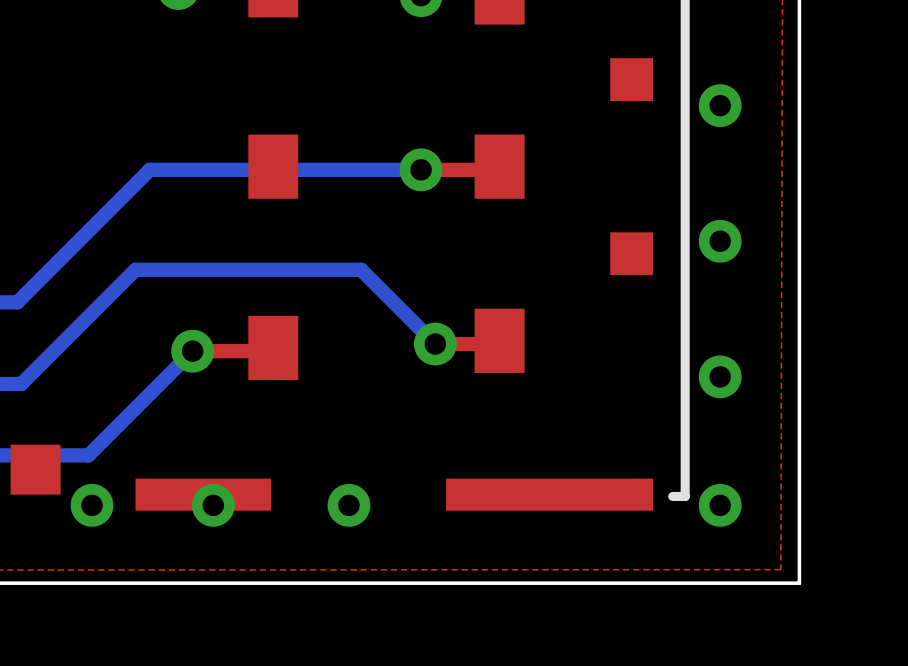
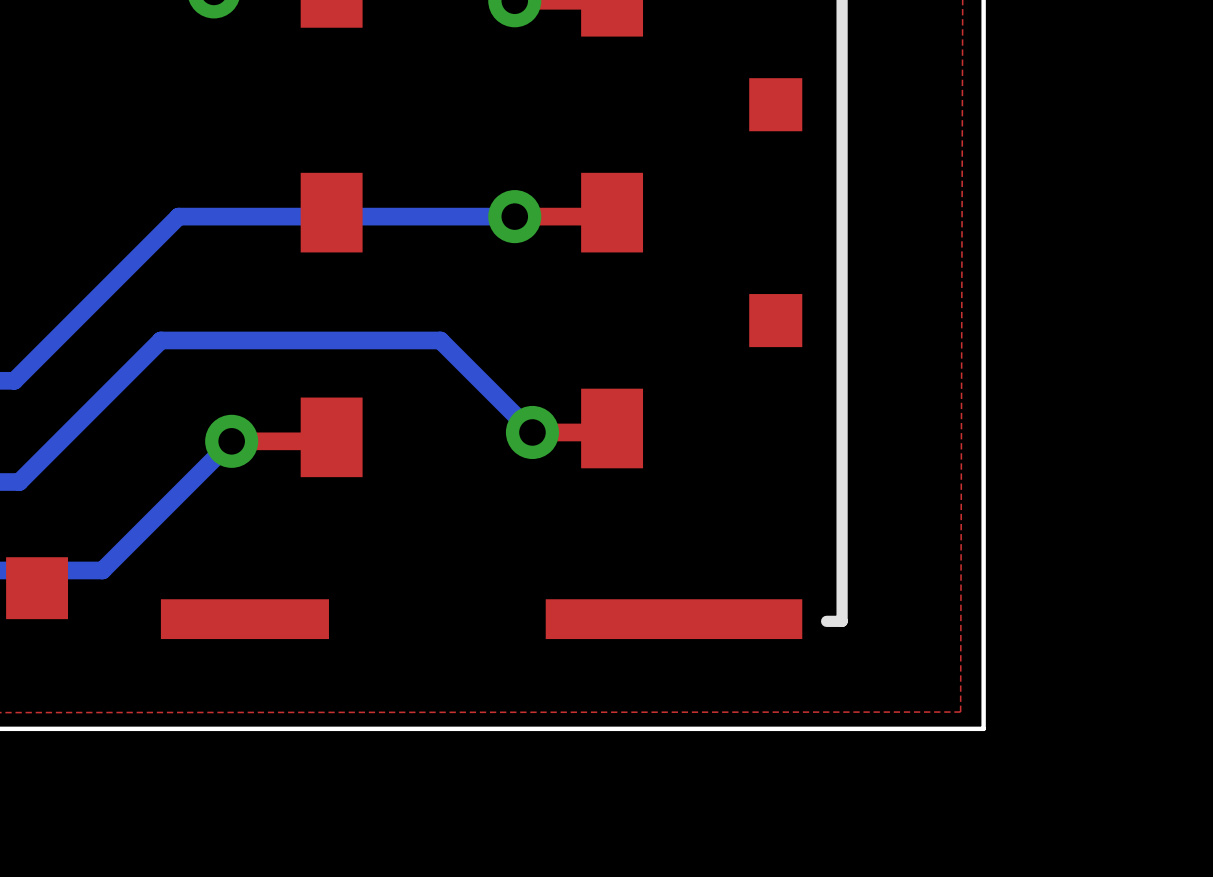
via: (720, 105) -> none
via: (720, 241) -> none
via: (720, 376) -> none
via: (92, 505) -> none
via: (213, 505) -> none
via: (348, 505) -> none
via: (720, 505) -> none

